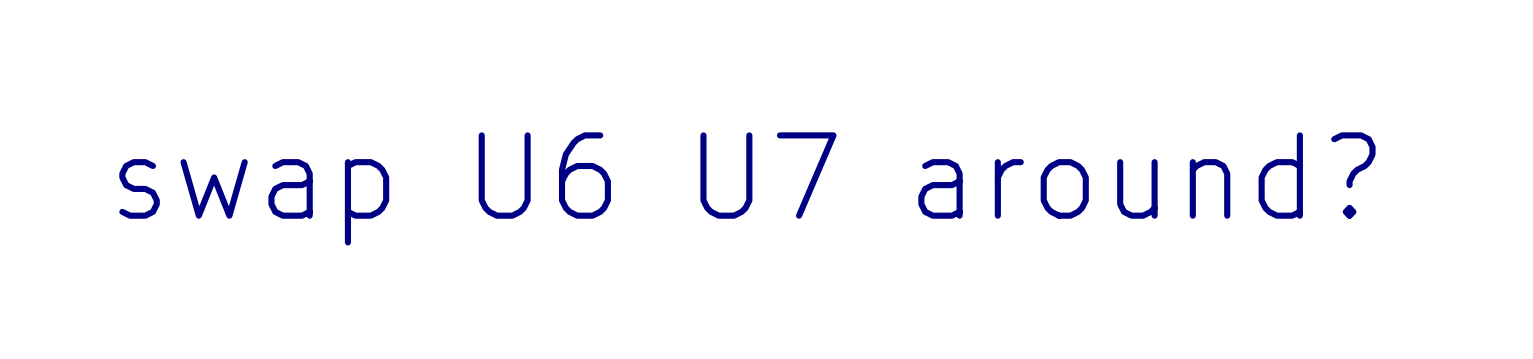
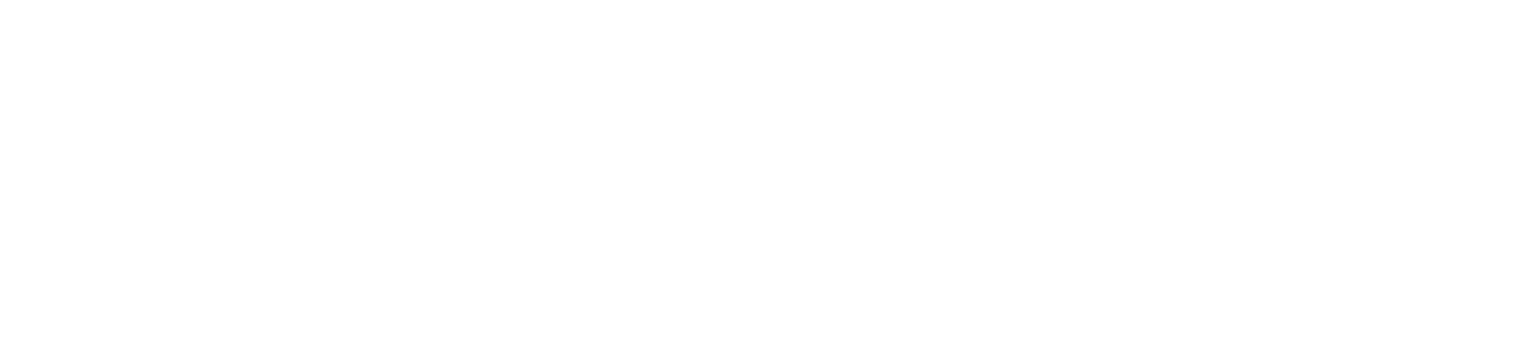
text: swap U6 U7 around? (747, 188) -> none

